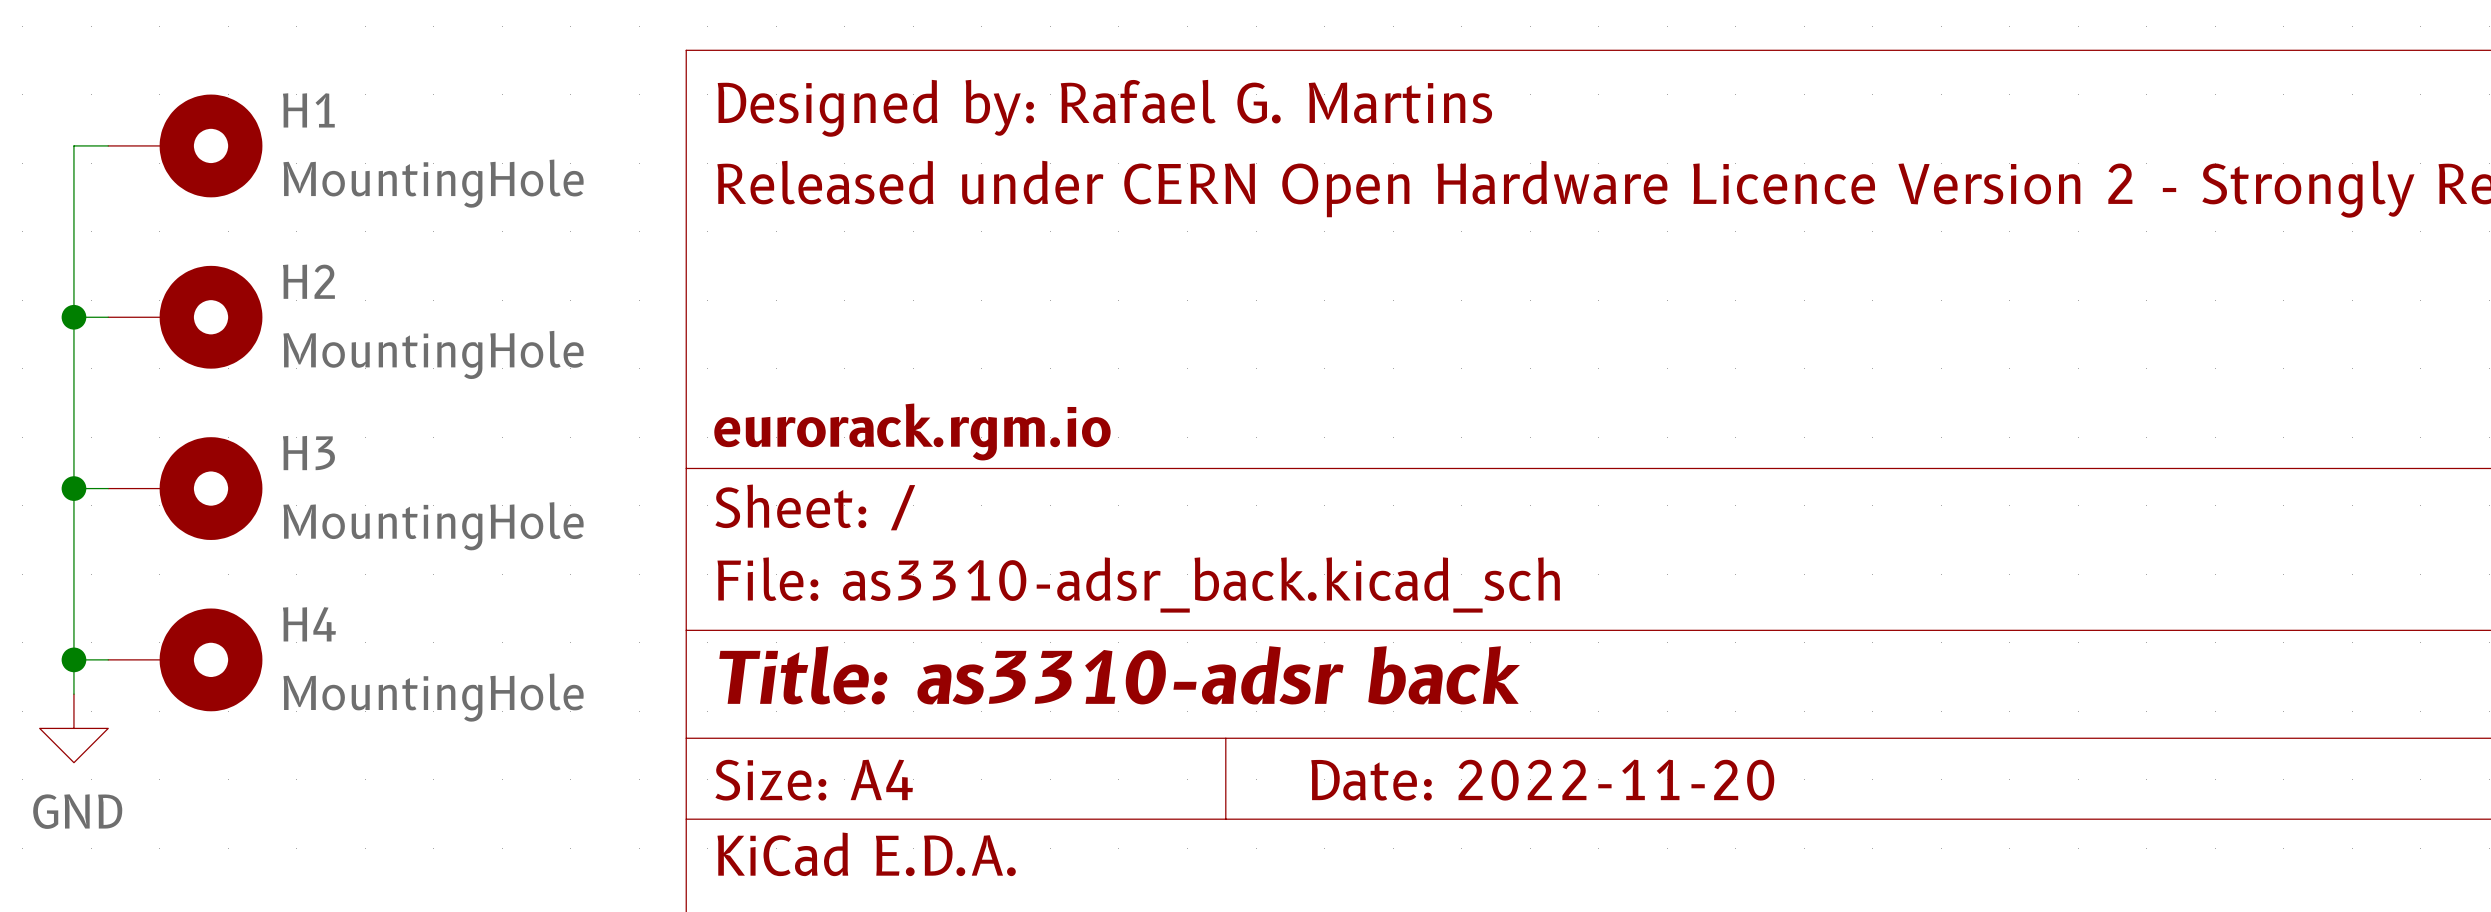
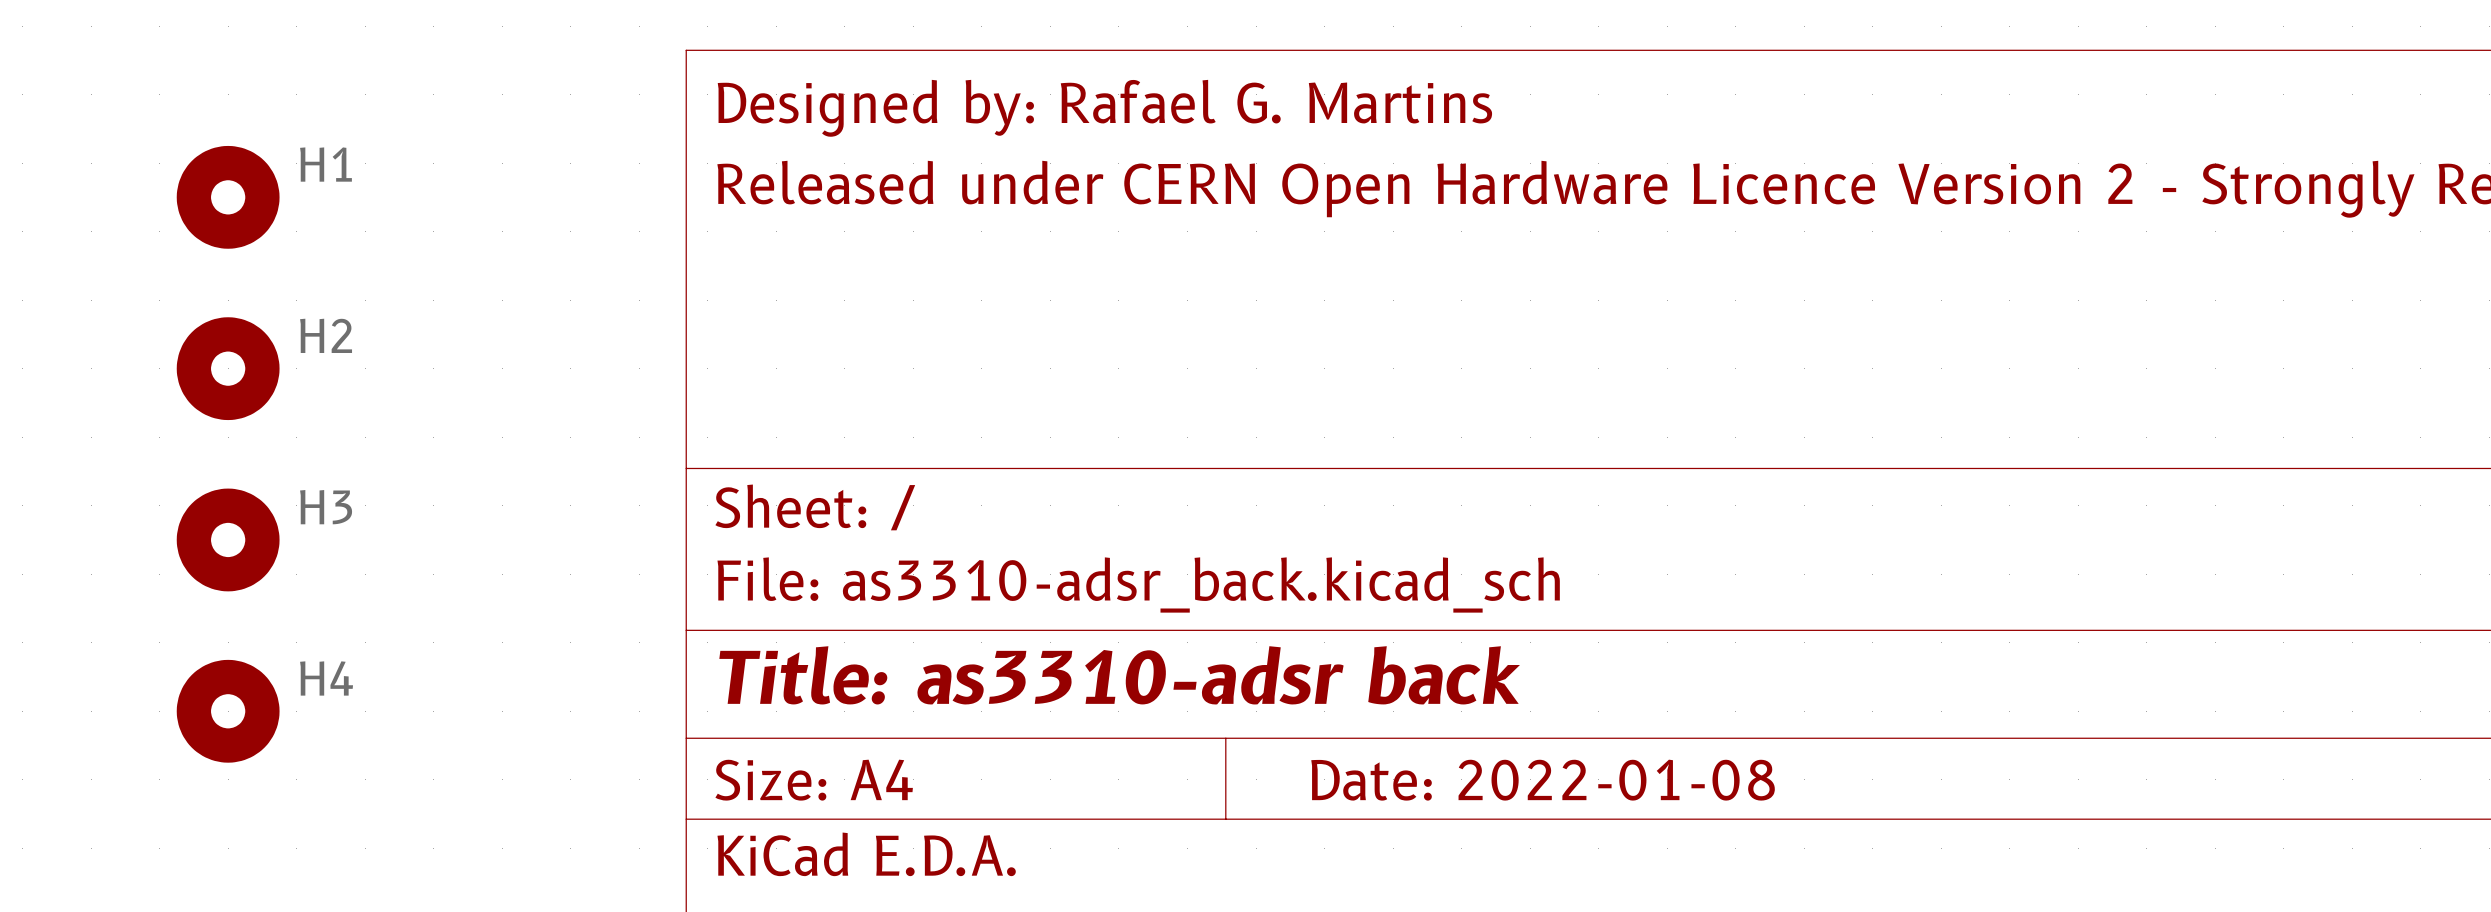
H1 symbol: [108, 94, 263, 198] -> [176, 145, 280, 249]
wire: (108, 145) (73, 145) (73, 694) -> none
H1 value: MountingHole (433, 183) -> none
H2 symbol: [108, 265, 263, 369] -> [176, 317, 280, 421]
wire: (73, 317) (108, 317) -> none
junction: (73, 317) -> none
H2 value: MountingHole (433, 354) -> none
title block: eurorack.rgm.io (912, 431) -> none
H3 symbol: [108, 437, 263, 540] -> [176, 488, 280, 592]
wire: (73, 488) (108, 488) -> none
junction: (73, 488) -> none
H3 value: MountingHole (433, 526) -> none
H4 symbol: [108, 608, 263, 712] -> [176, 659, 280, 763]
wire: (73, 659) (108, 659) -> none
junction: (73, 659) -> none
H4 value: MountingHole (433, 697) -> none
power symbol: GND (73, 728) -> none
title block: Date: 2022-11-20 (1542, 780) -> Date: 2022-01-08 (1543, 780)

